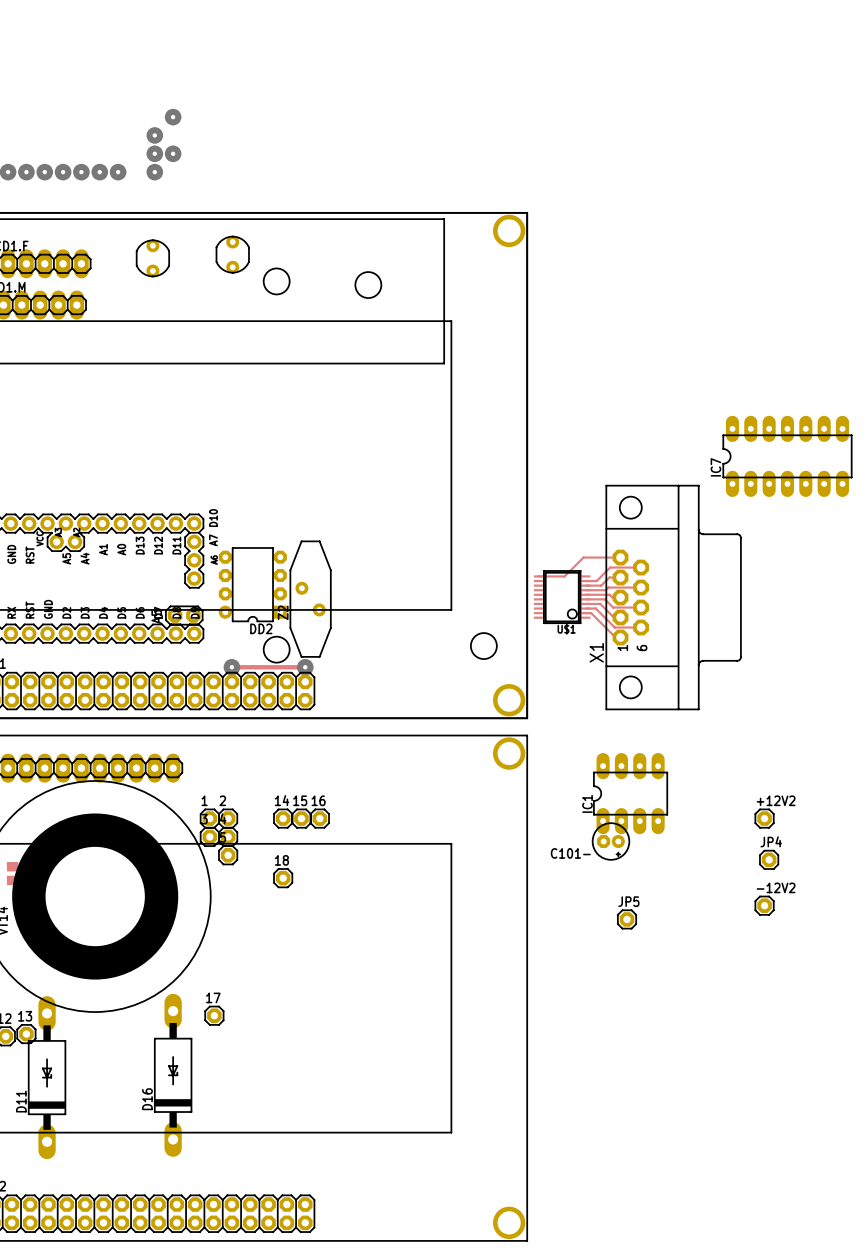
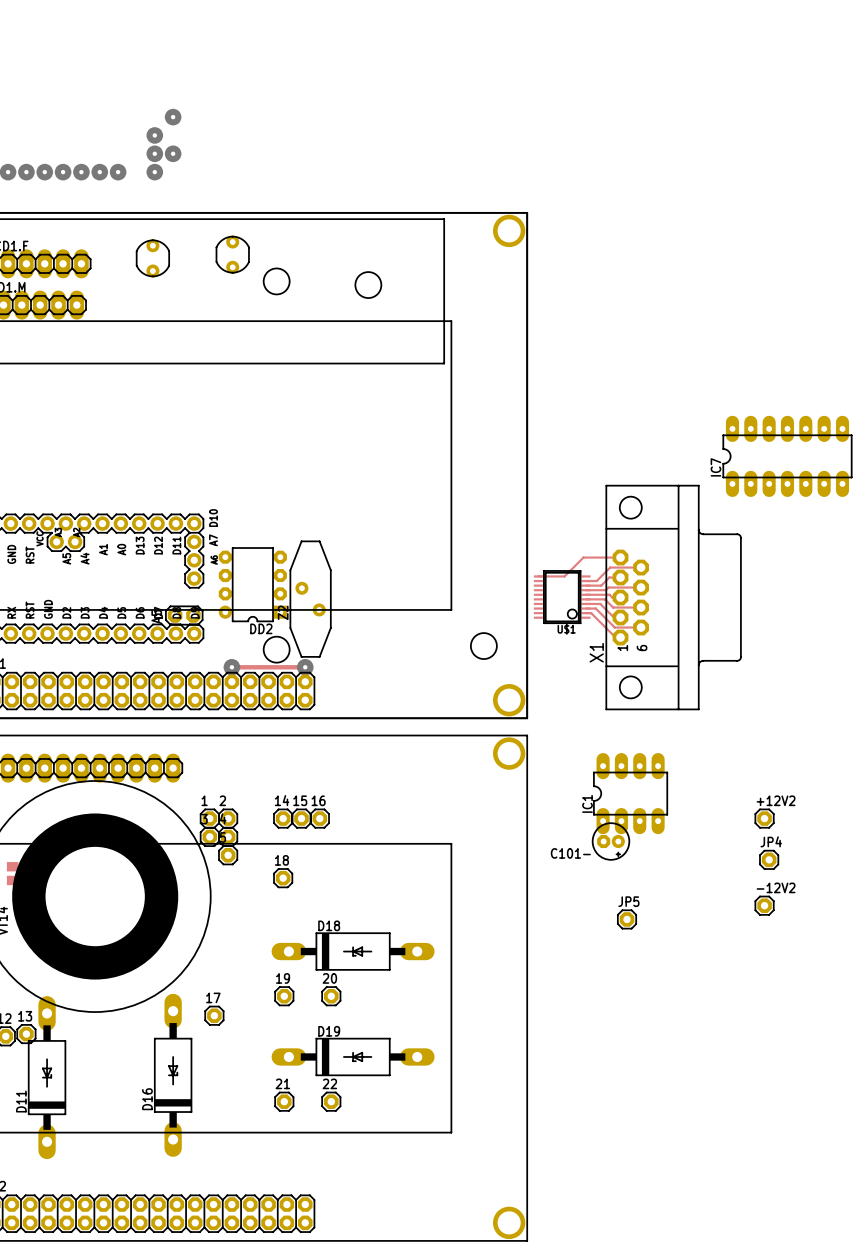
D18: none -> (353, 951)
19: none -> (284, 996)
20: none -> (331, 996)
D19: none -> (353, 1056)
21: none -> (284, 1101)
22: none -> (331, 1101)

